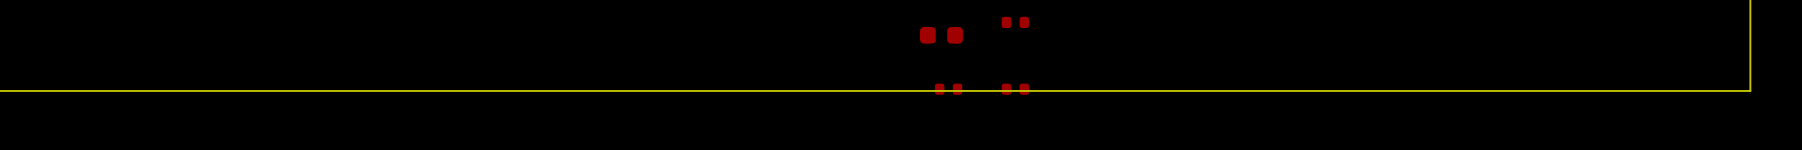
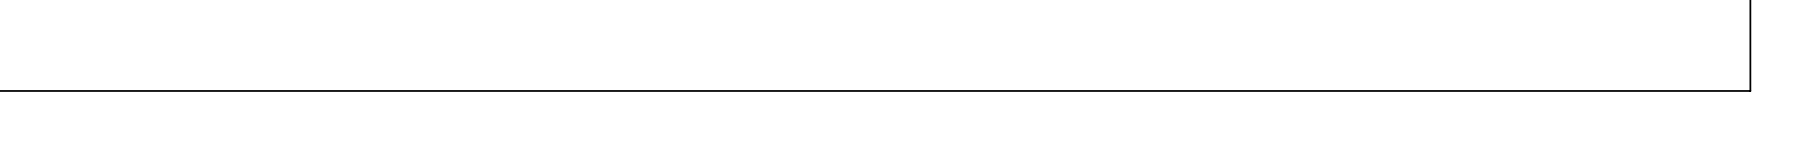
part: (1015, 22) -> none
part: (941, 35) -> none
part: (948, 89) -> none
part: (1015, 89) -> none

